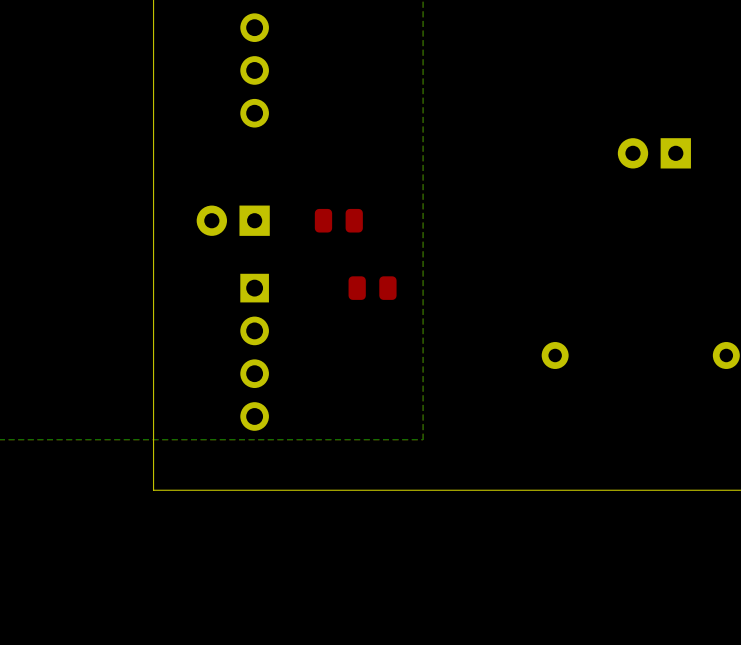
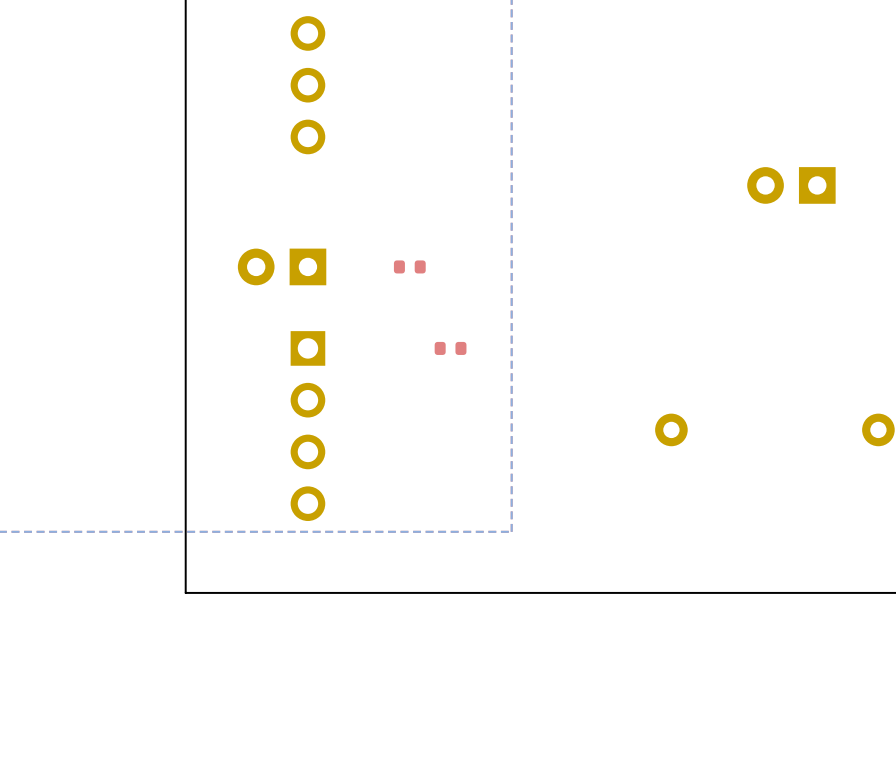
part footprint: [314, 208, 363, 233] -> [393, 260, 426, 274]
part footprint: [348, 276, 397, 300] -> [434, 341, 467, 355]

